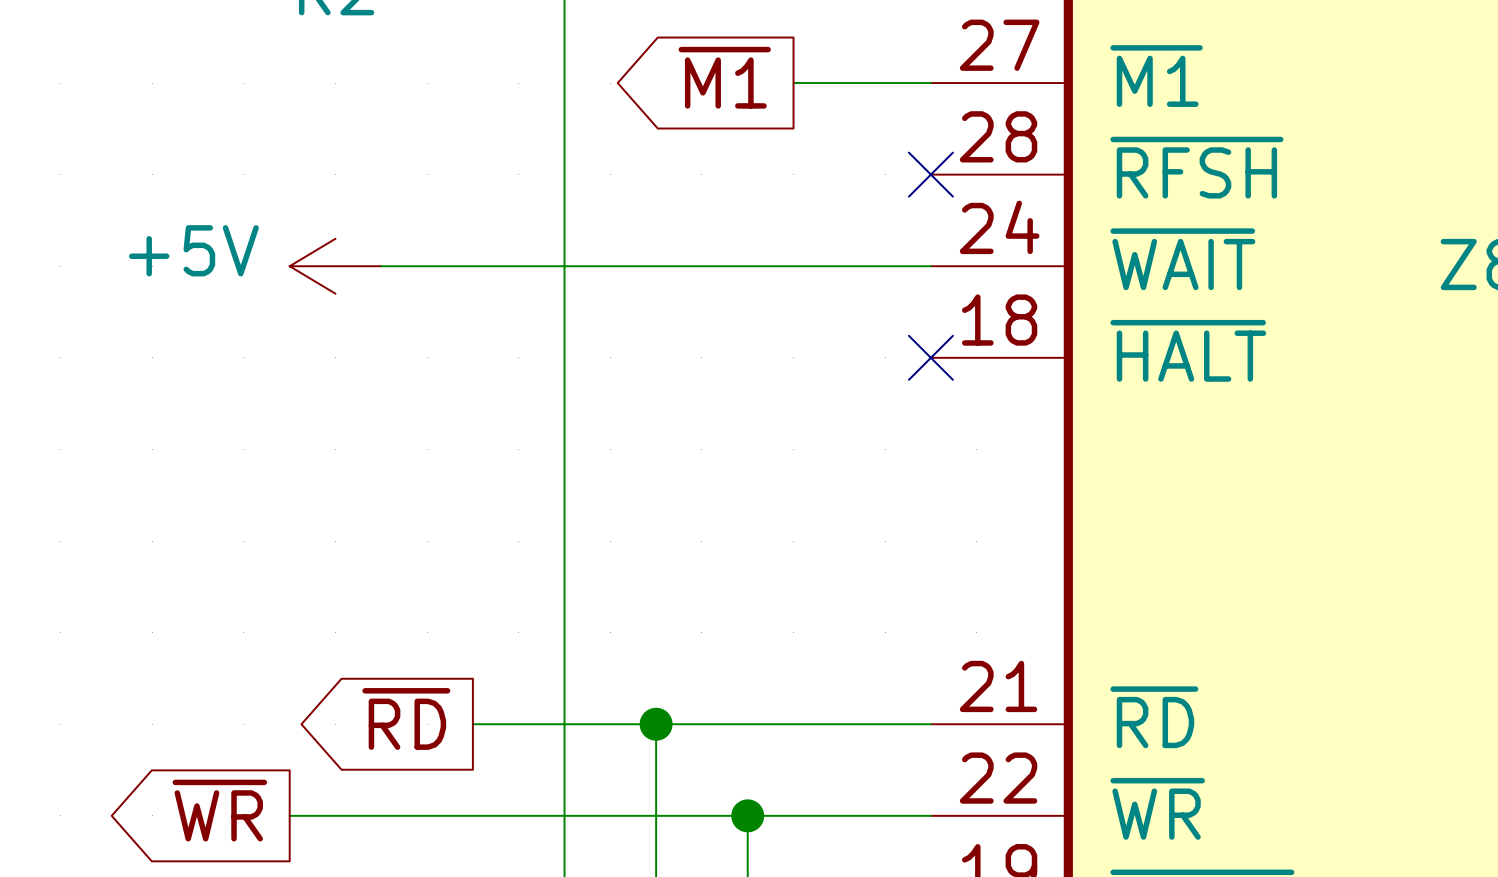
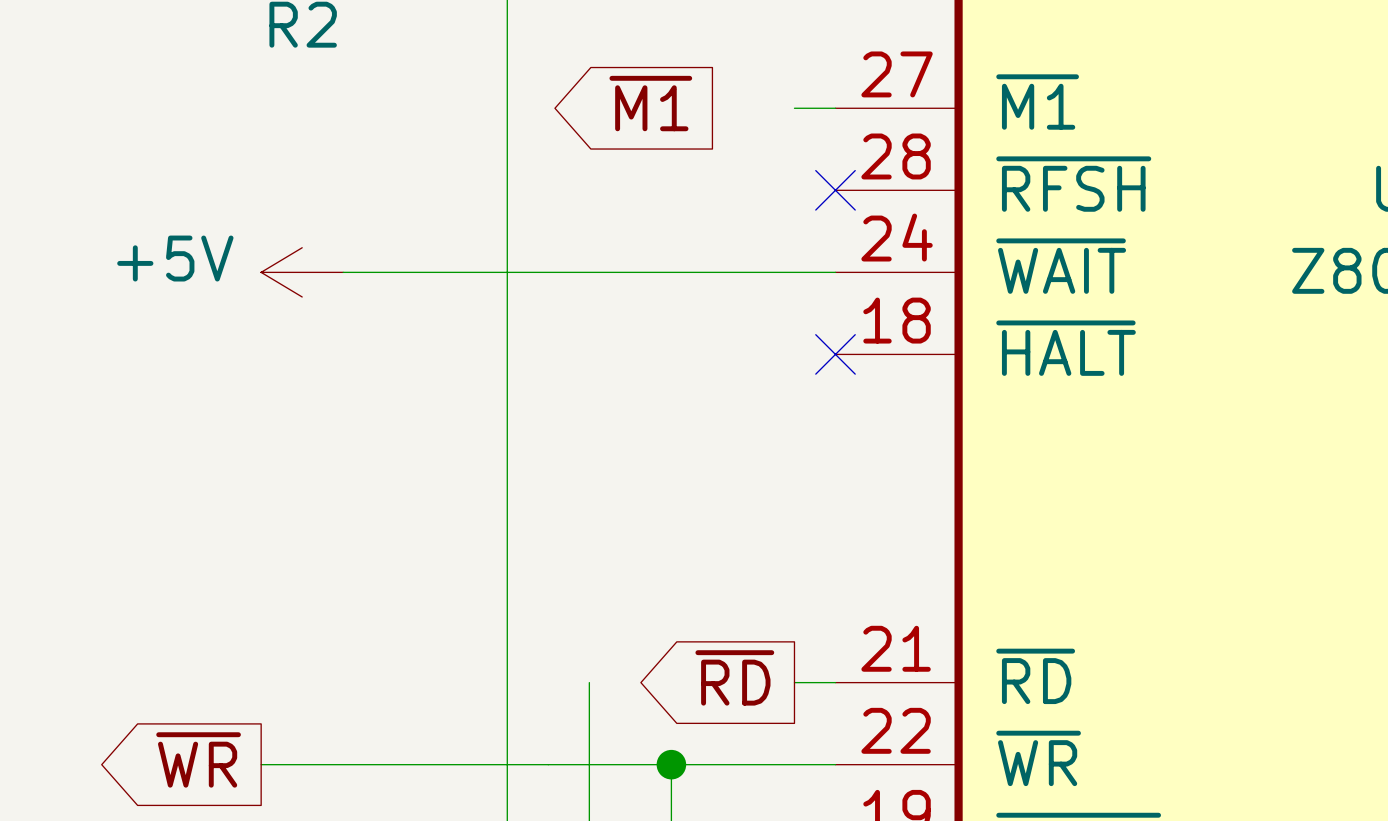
wire: (793, 83) (885, 83) -> none
global label position: ~{RD} (406, 718) -> ~{RD} (734, 677)
wire: (472, 724) (885, 724) -> none
junction: (656, 724) -> none

